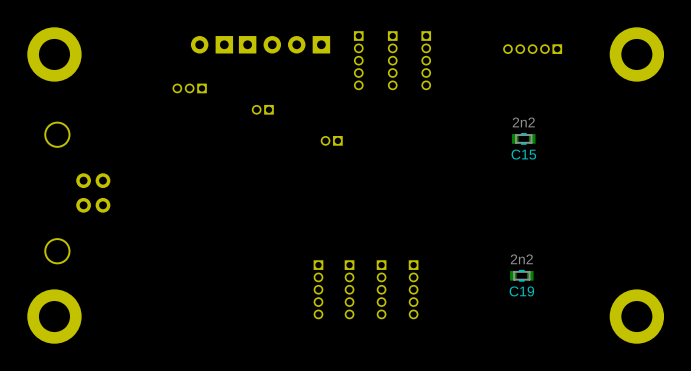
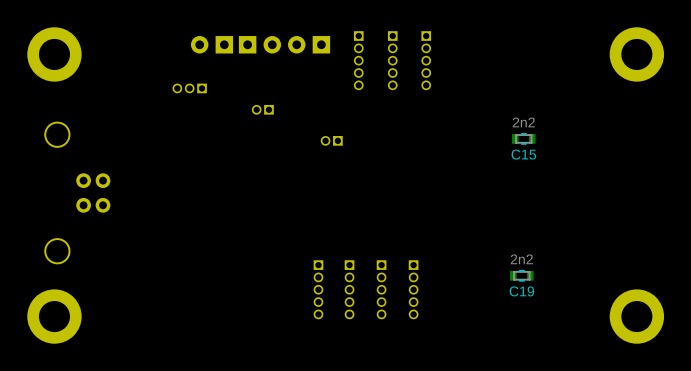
part: (532, 49) -> none

